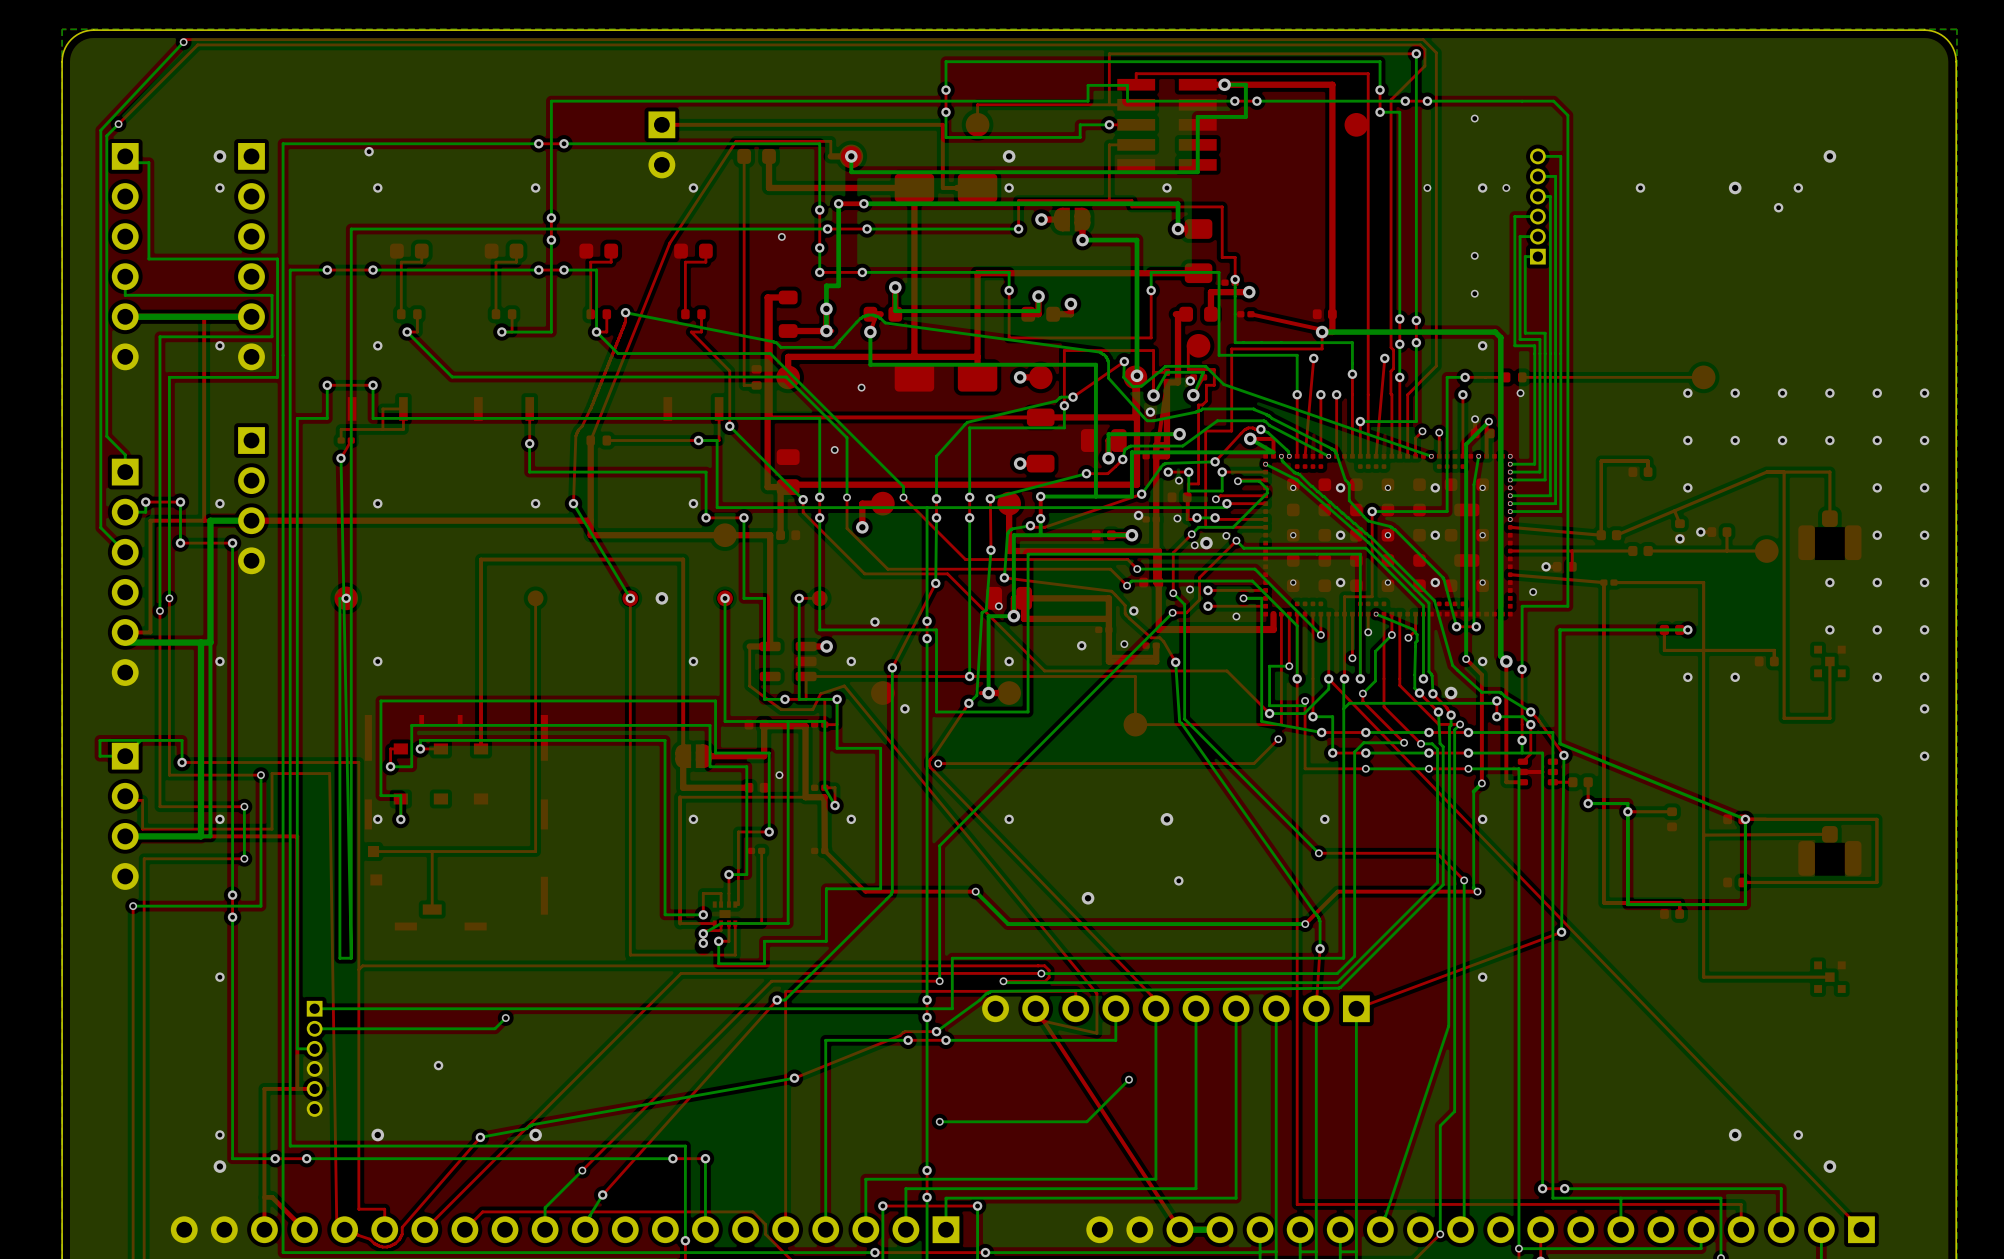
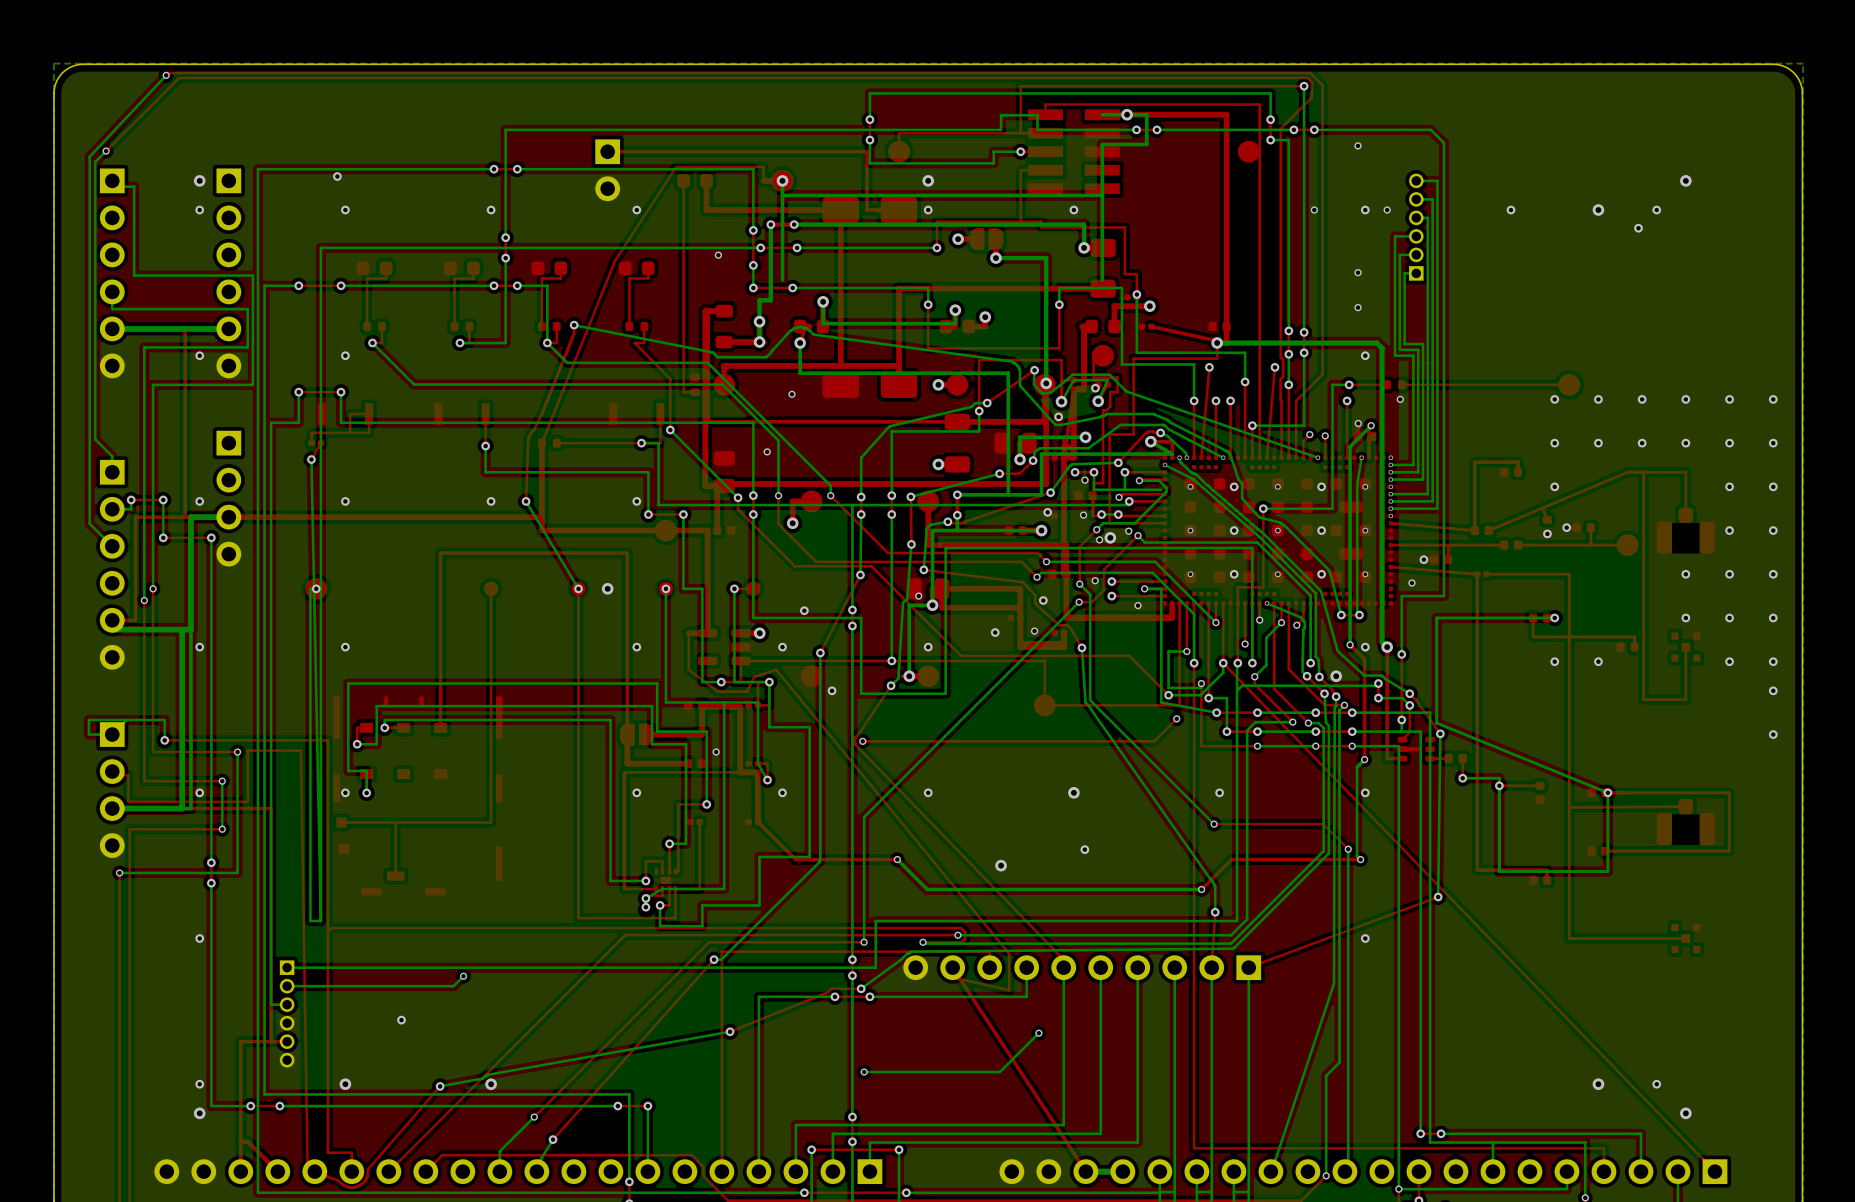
bottom track: none -> (1127, 114) (1102, 114)
bottom track: none -> (782, 195) (782, 279)
bottom track: none -> (1102, 195) (1102, 279)
bottom track: none -> (1161, 489) (1124, 489)

